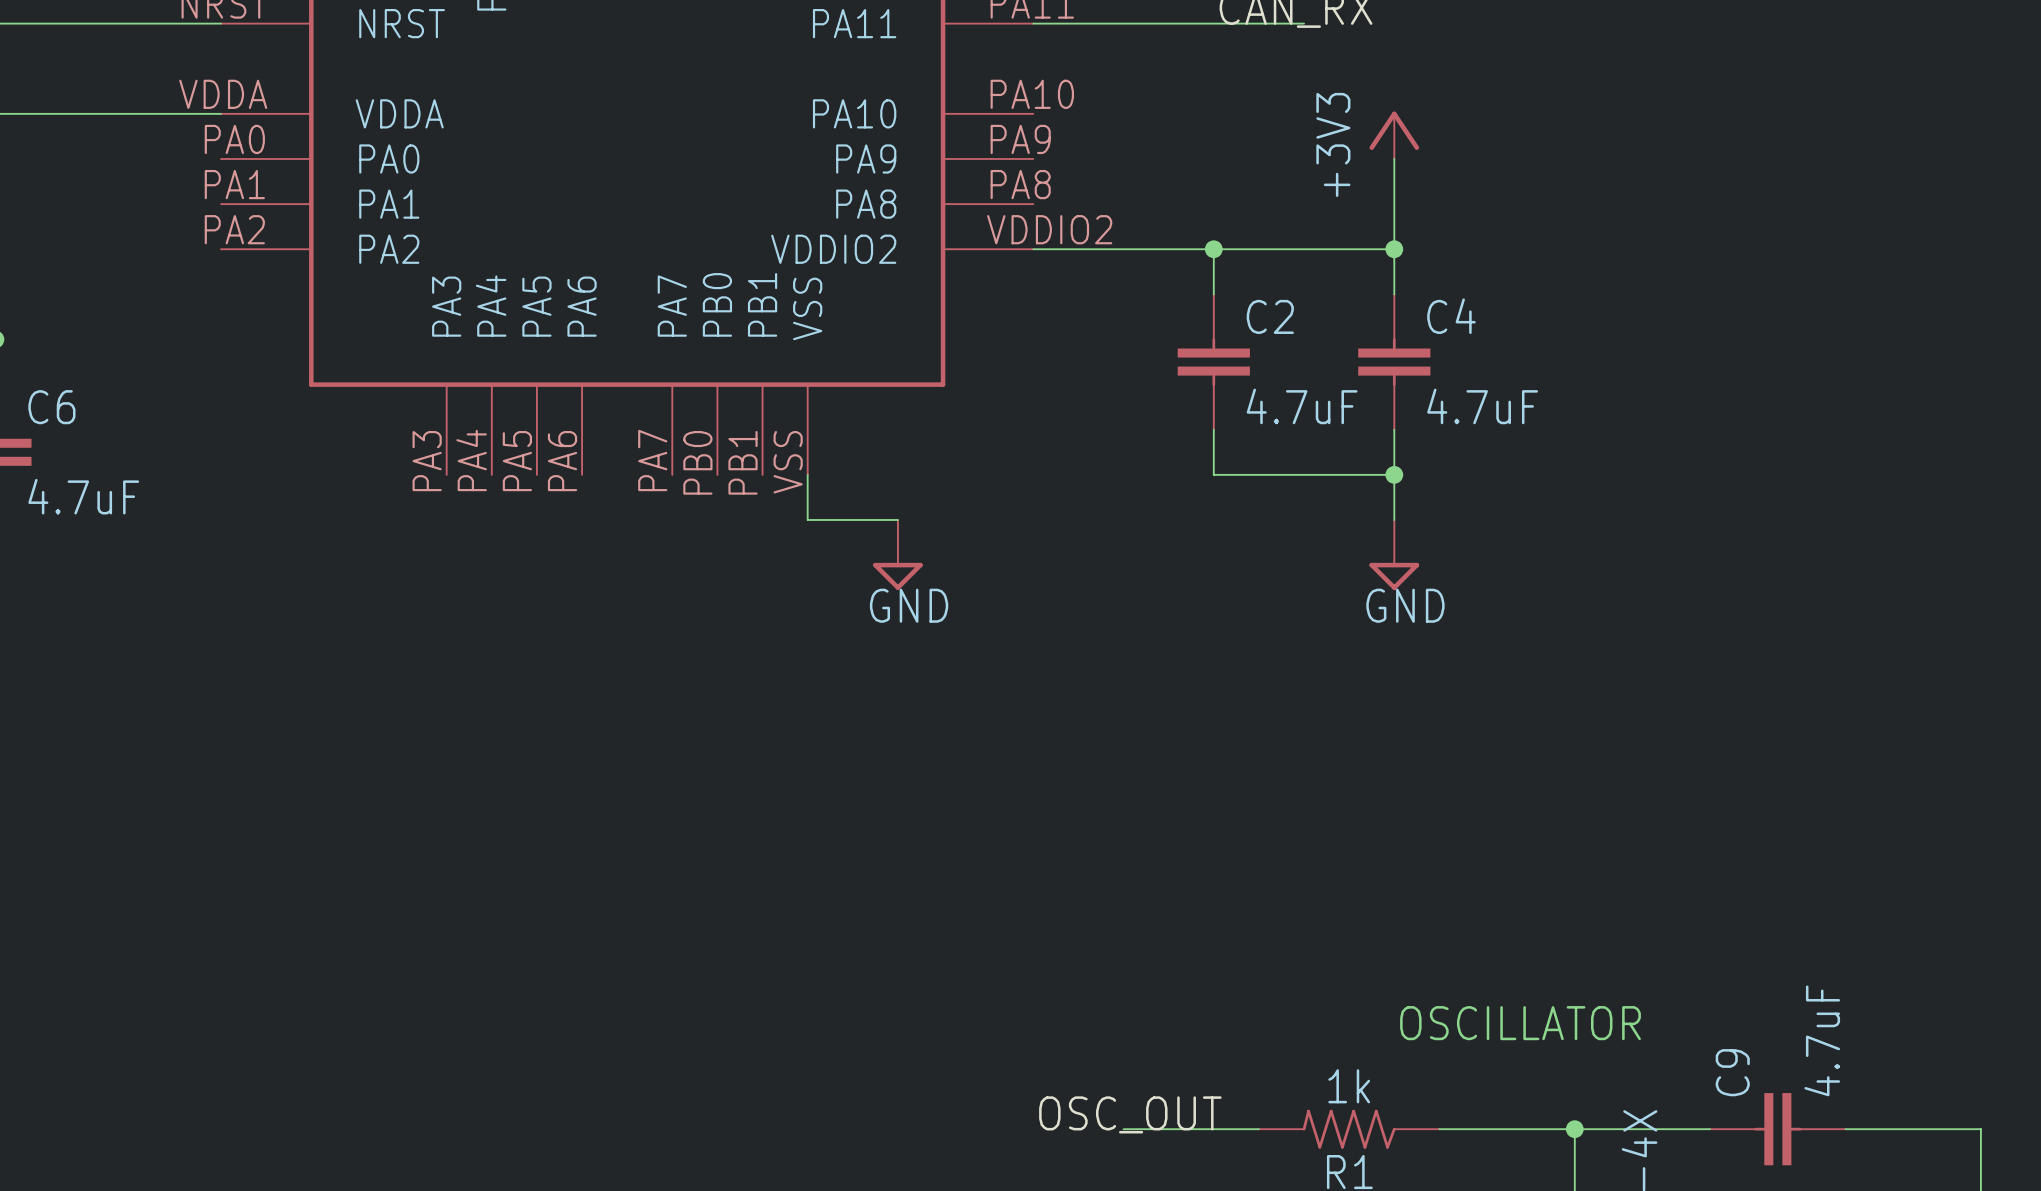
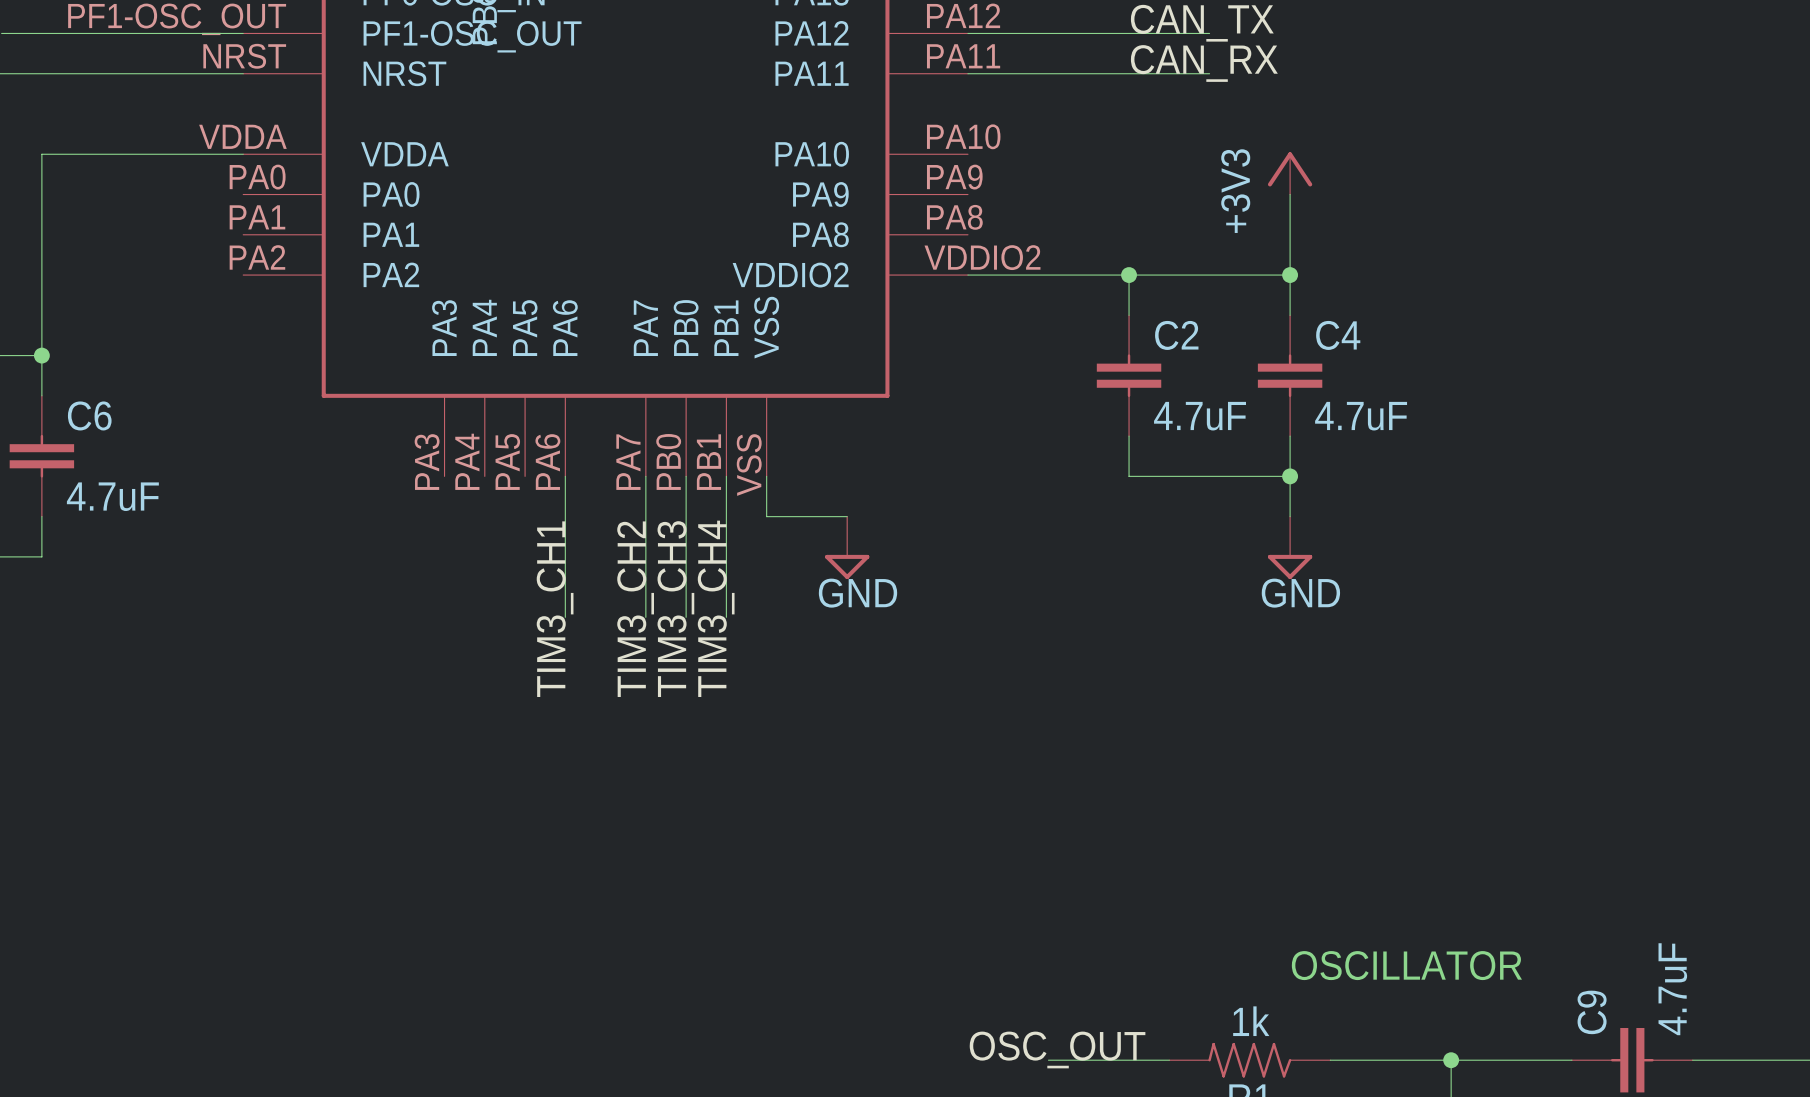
wire: none -> (565, 476) (565, 617)
wire: none -> (645, 476) (645, 617)
wire: none -> (686, 476) (686, 617)
wire: none -> (726, 476) (726, 617)
label: none -> TIM3_CH1 (555, 609)
label: none -> TIM3_CH2 (635, 609)
label: none -> TIM3_CH3 (675, 609)
label: none -> TIM3_CH4 (716, 608)

